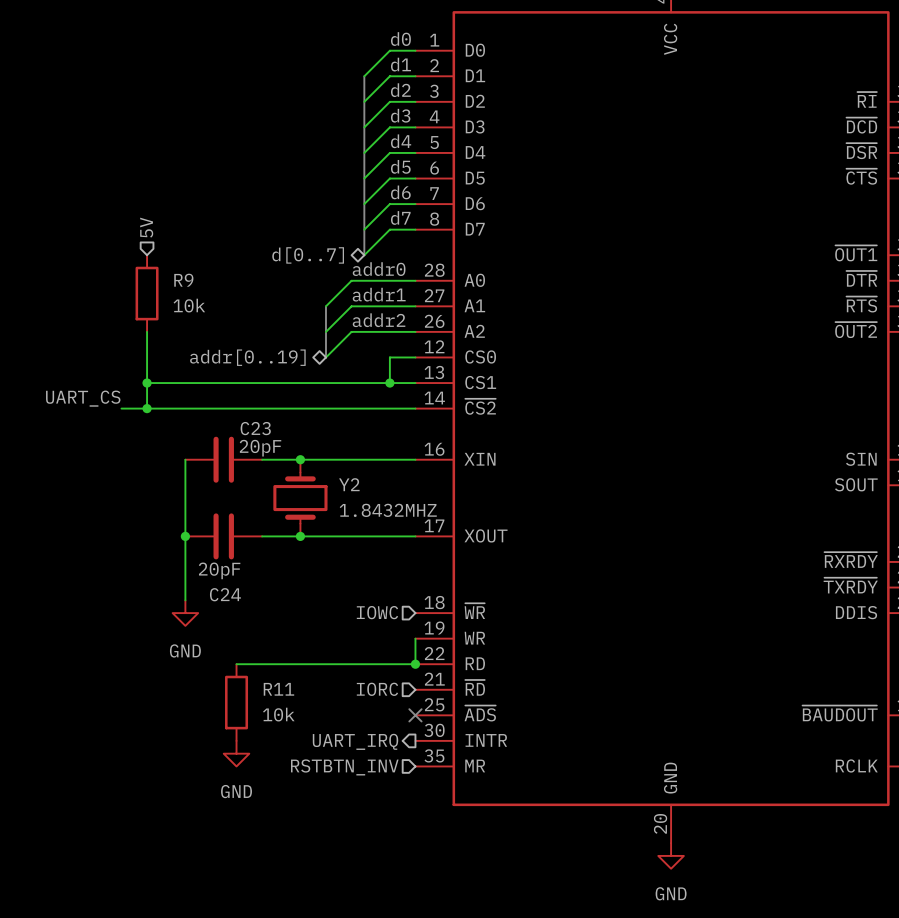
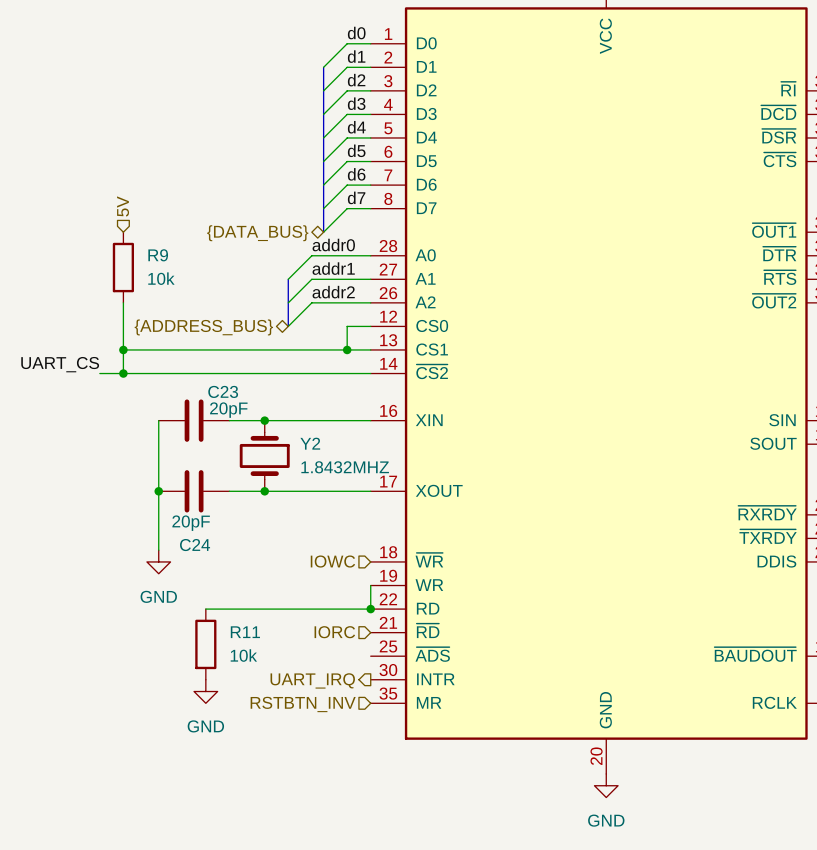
hierarchical label: d[0..7] (308, 255) -> {DATA_BUS} (257, 233)
hierarchical label: addr[0..19] (247, 357) -> {ADDRESS_BUS} (203, 327)
no-connect mark: (415, 715) -> none

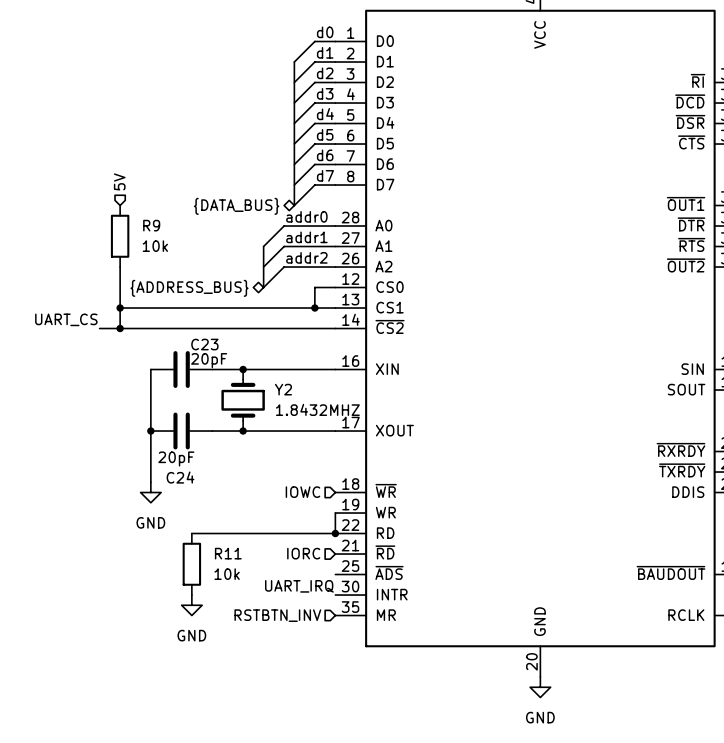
label: none -> UART_IRQ (299, 586)
hierarchical label: UART_IRQ (312, 680) -> none

